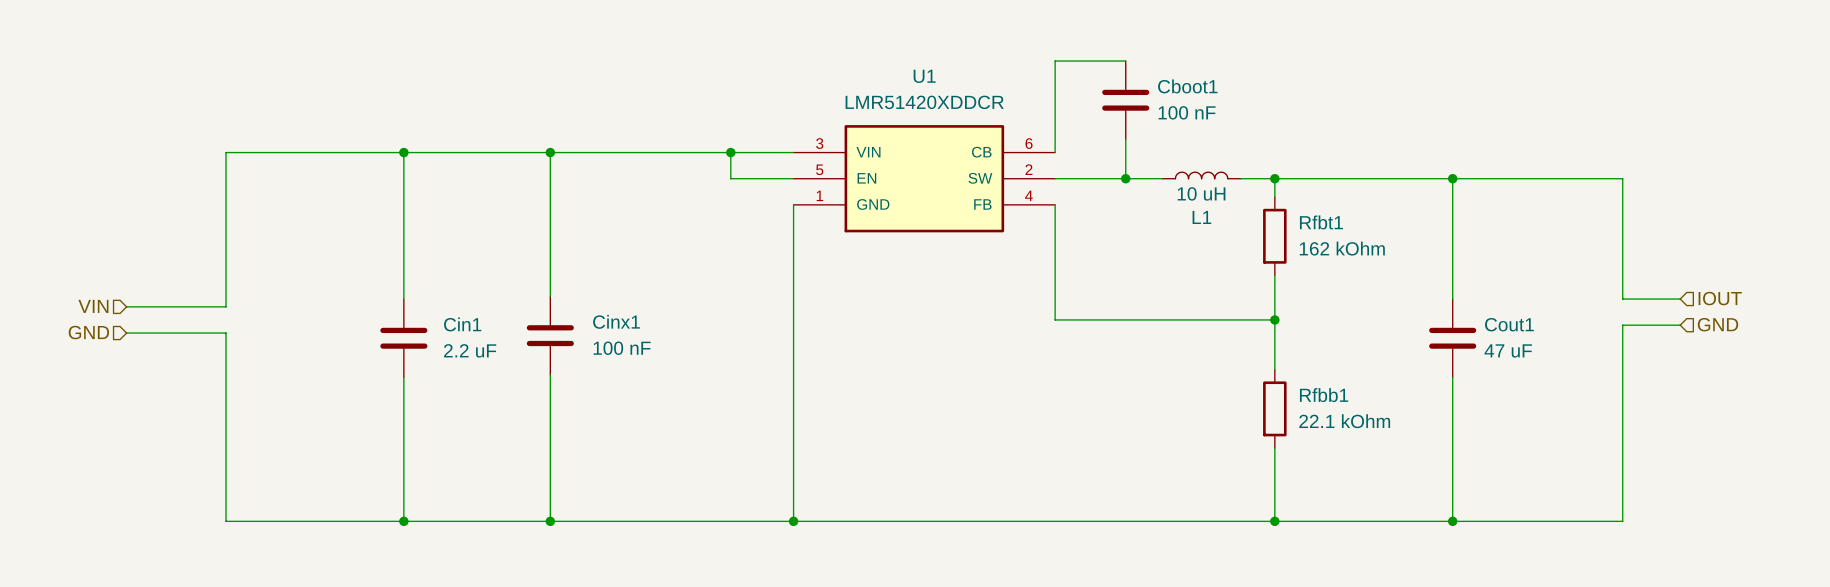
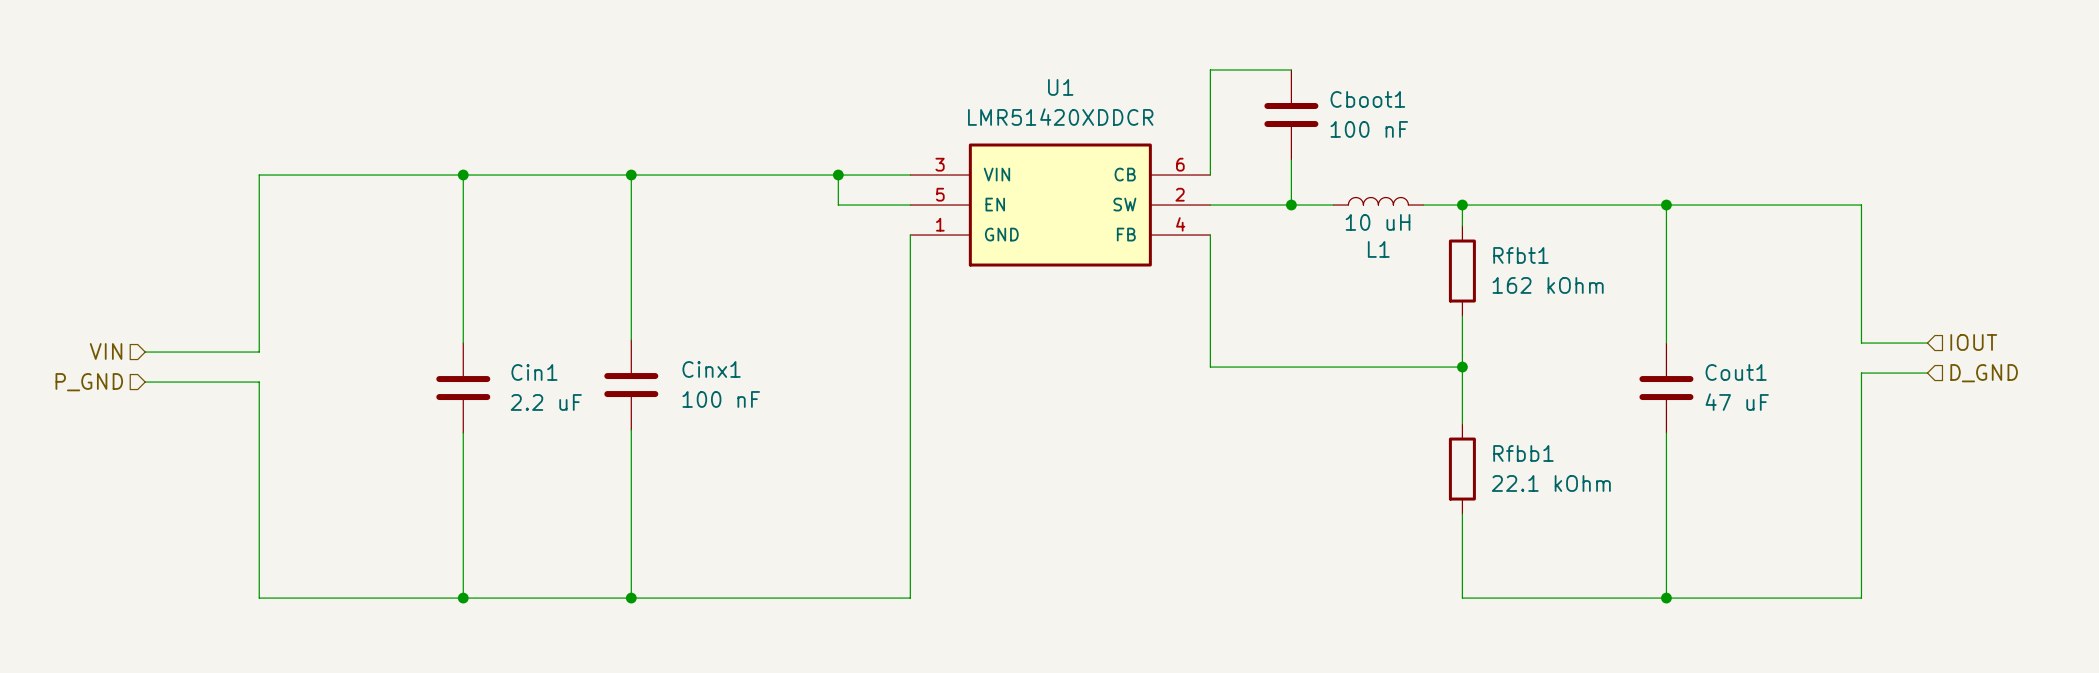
hierarchical label: GND (1718, 324) -> D_GND (1984, 373)
hierarchical label: GND (88, 332) -> P_GND (89, 382)
wire: (793, 521) (1274, 521) -> none
junction: (793, 521) -> none
junction: (1274, 521) -> none

